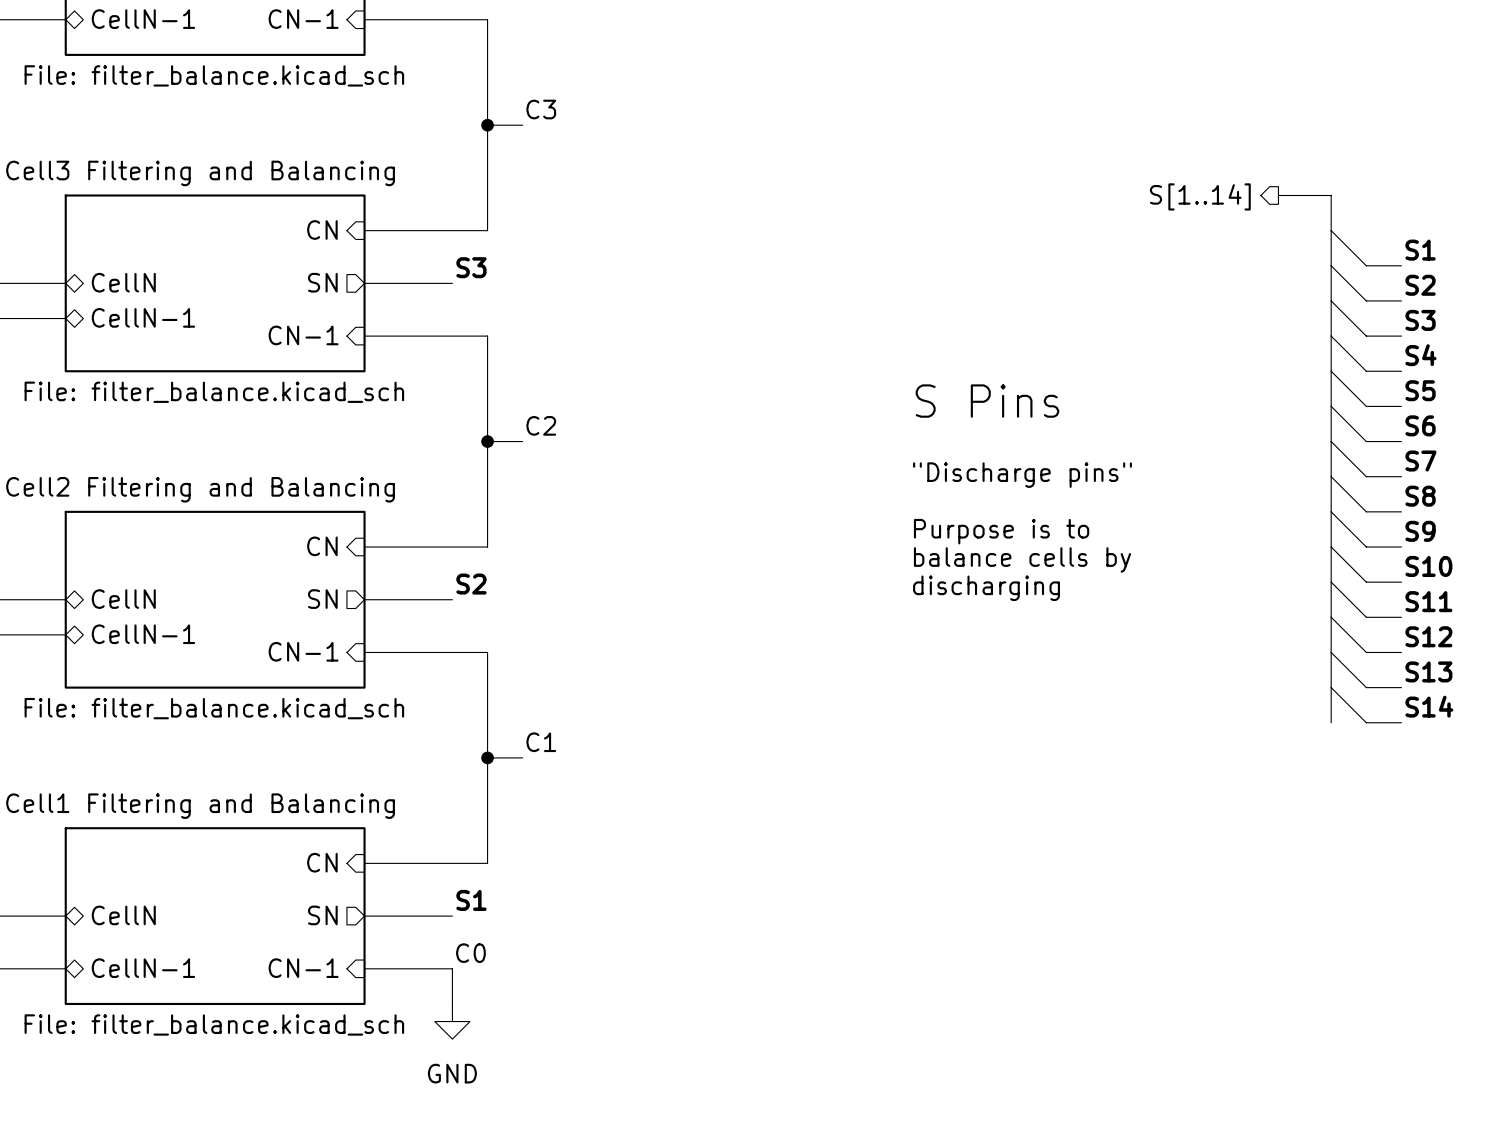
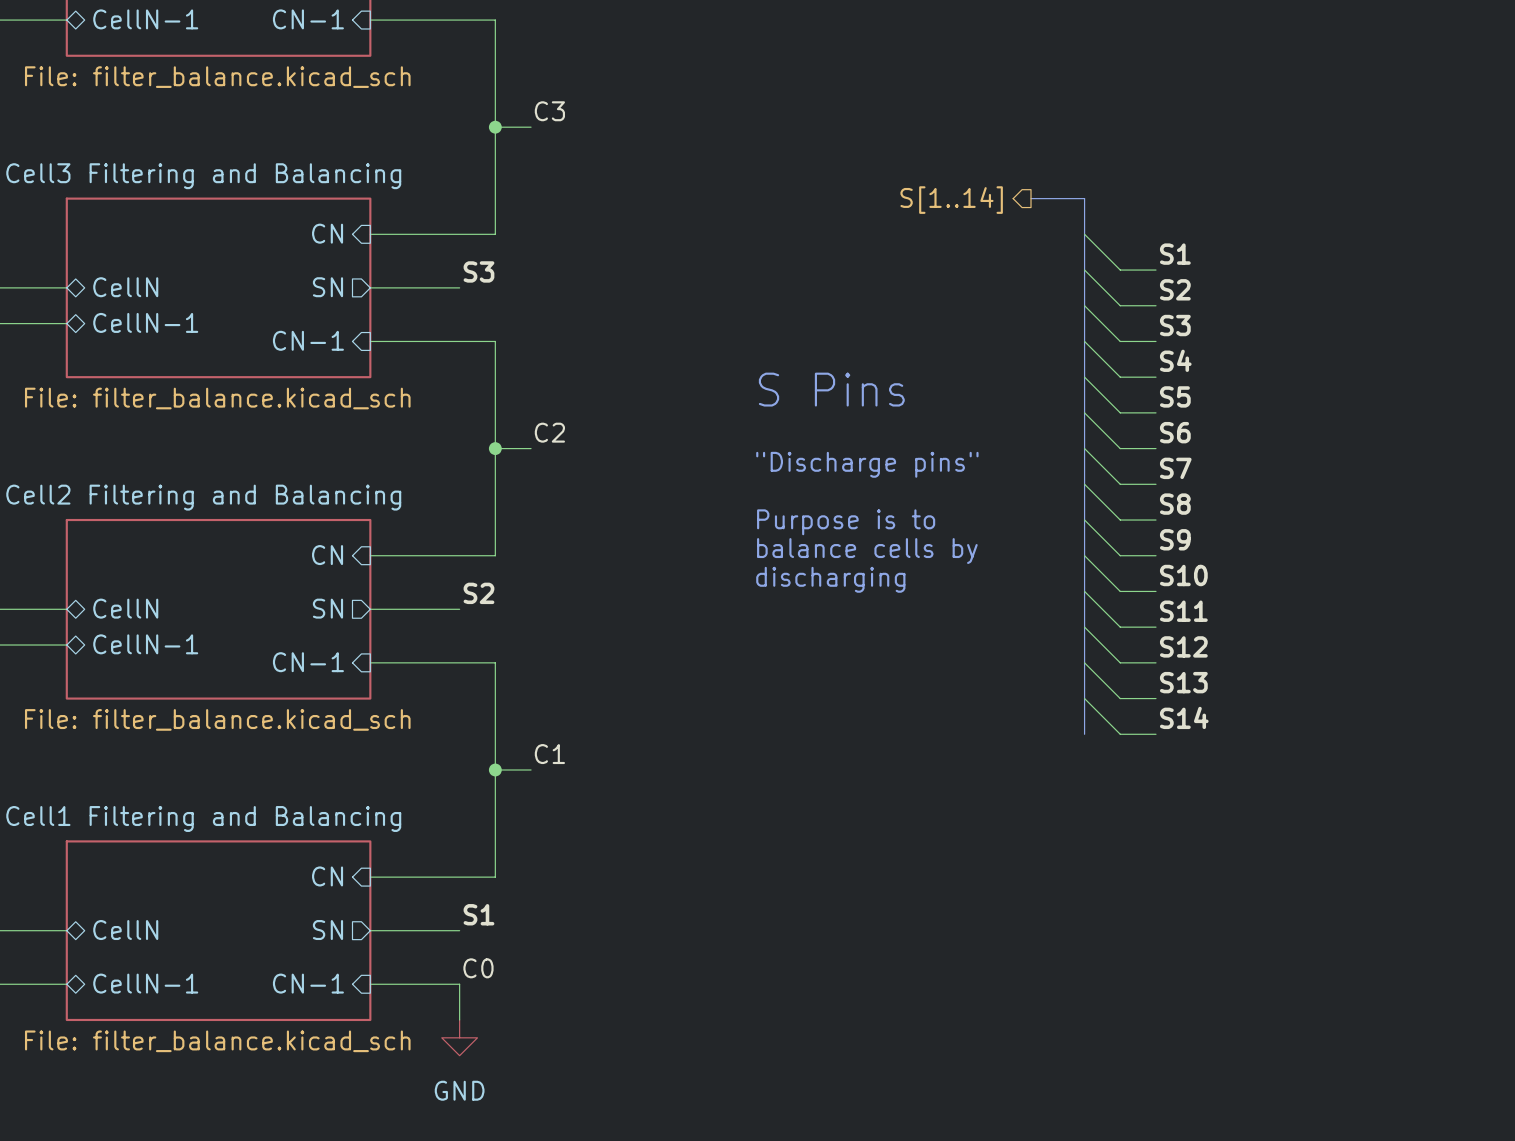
bus: (1278, 195) (1331, 195) (1331, 722) -> (1031, 198) (1084, 198) (1084, 734)
hierarchical label position: S[1..14] (1200, 196) -> S[1..14] (951, 200)
wire: (1331, 230) (1366, 265) (1401, 265) -> (1084, 234) (1120, 270) (1155, 270)
label position: S1 (1420, 250) -> S1 (1175, 254)
wire: (1331, 265) (1366, 300) (1401, 300) -> (1084, 270) (1120, 305) (1155, 305)
label position: S2 (1420, 285) -> S2 (1175, 289)
wire: (1331, 300) (1366, 336) (1401, 336) -> (1084, 305) (1120, 341) (1155, 341)
label position: S3 (1420, 320) -> S3 (1175, 325)
wire: (1331, 336) (1366, 371) (1401, 371) -> (1084, 341) (1120, 377) (1155, 377)
label position: S4 (1420, 355) -> S4 (1175, 360)
wire: (1331, 371) (1366, 406) (1401, 406) -> (1084, 377) (1120, 412) (1155, 412)
label position: S5 (1420, 390) -> S5 (1175, 396)
text position: S Pins (987, 401) -> S Pins (831, 389)
wire: (1331, 406) (1366, 441) (1401, 441) -> (1084, 412) (1120, 448) (1155, 448)
label position: S6 (1420, 425) -> S6 (1175, 432)
wire: (1331, 441) (1366, 476) (1401, 476) -> (1084, 448) (1120, 484) (1155, 484)
label position: S7 (1420, 461) -> S7 (1175, 468)
text position: "Discharge pins" (1022, 475) -> "Discharge pins" (867, 464)
wire: (1331, 476) (1366, 511) (1401, 511) -> (1084, 484) (1120, 520) (1155, 520)
label position: S8 (1420, 496) -> S8 (1175, 504)
wire: (1331, 511) (1366, 547) (1401, 547) -> (1084, 520) (1120, 555) (1155, 555)
text position: Purpose is to (1001, 531) -> Purpose is to (846, 522)
label position: S9 (1420, 531) -> S9 (1175, 539)
wire: (1331, 547) (1366, 582) (1401, 582) -> (1084, 555) (1120, 591) (1155, 591)
text position: balance cells by (1022, 559) -> balance cells by (867, 551)
label position: S10 (1428, 566) -> S10 (1183, 575)
wire: (1331, 582) (1366, 617) (1401, 617) -> (1084, 591) (1120, 627) (1155, 627)
text position: discharging (986, 588) -> discharging (830, 579)
label position: S11 (1428, 601) -> S11 (1183, 611)
wire: (1331, 617) (1366, 652) (1401, 652) -> (1084, 627) (1120, 662) (1155, 662)
label position: S12 (1428, 636) -> S12 (1183, 646)
wire: (1331, 652) (1366, 687) (1401, 687) -> (1084, 662) (1120, 698) (1155, 698)
label position: S13 (1428, 671) -> S13 (1183, 682)
wire: (1331, 687) (1366, 722) (1401, 722) -> (1084, 698) (1120, 734) (1155, 734)
label position: S14 (1429, 706) -> S14 (1184, 717)

